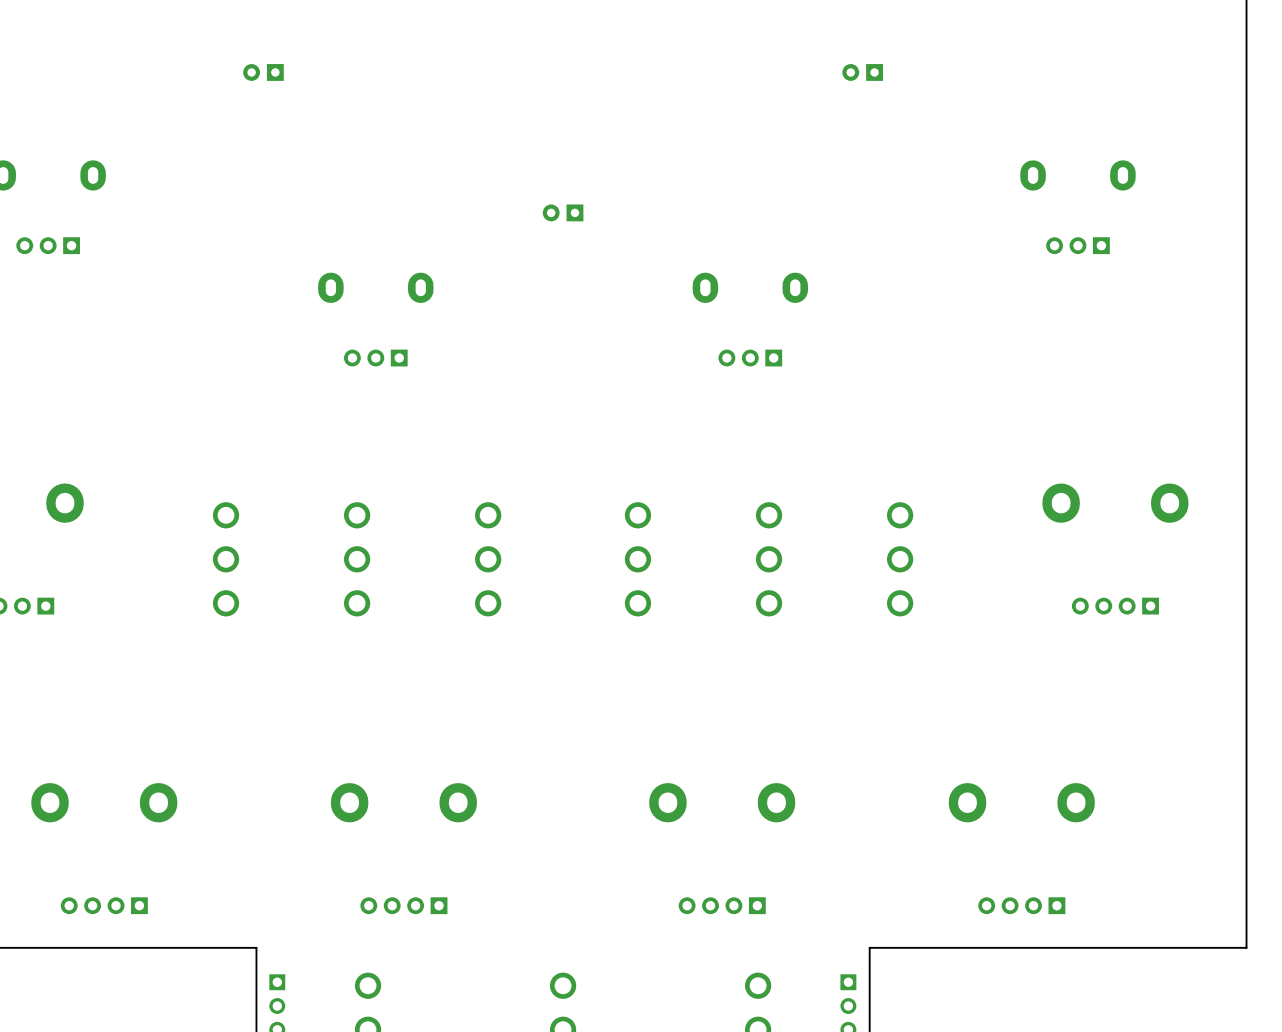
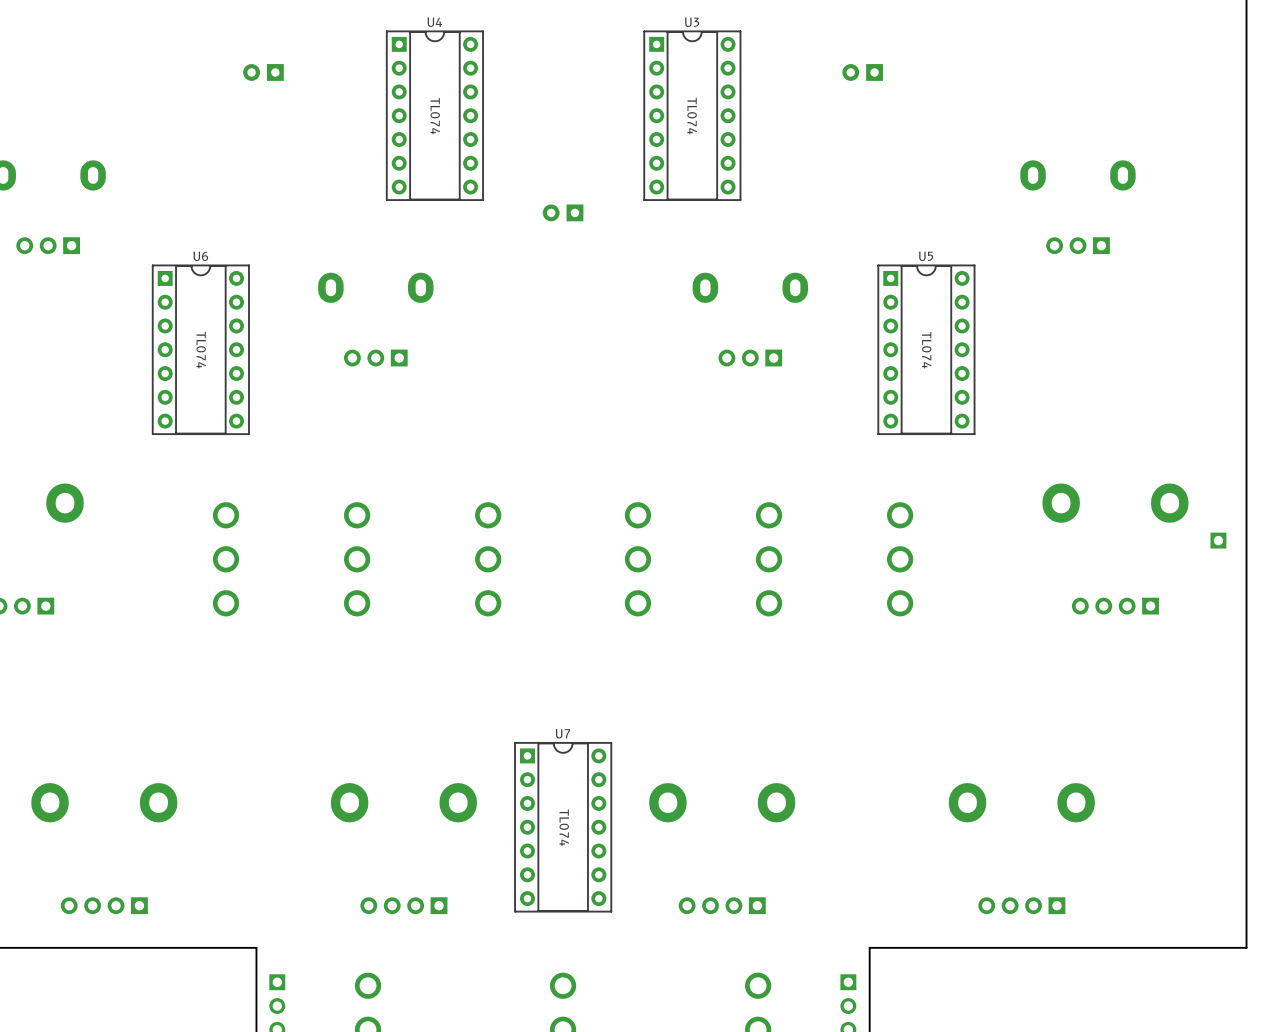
U4: none -> TL074 (434, 115)
U3: none -> TL074 (692, 115)
U6: none -> TL074 (200, 349)
U5: none -> TL074 (926, 349)
part: none -> (1218, 540)
U7: none -> TL074 (563, 827)

